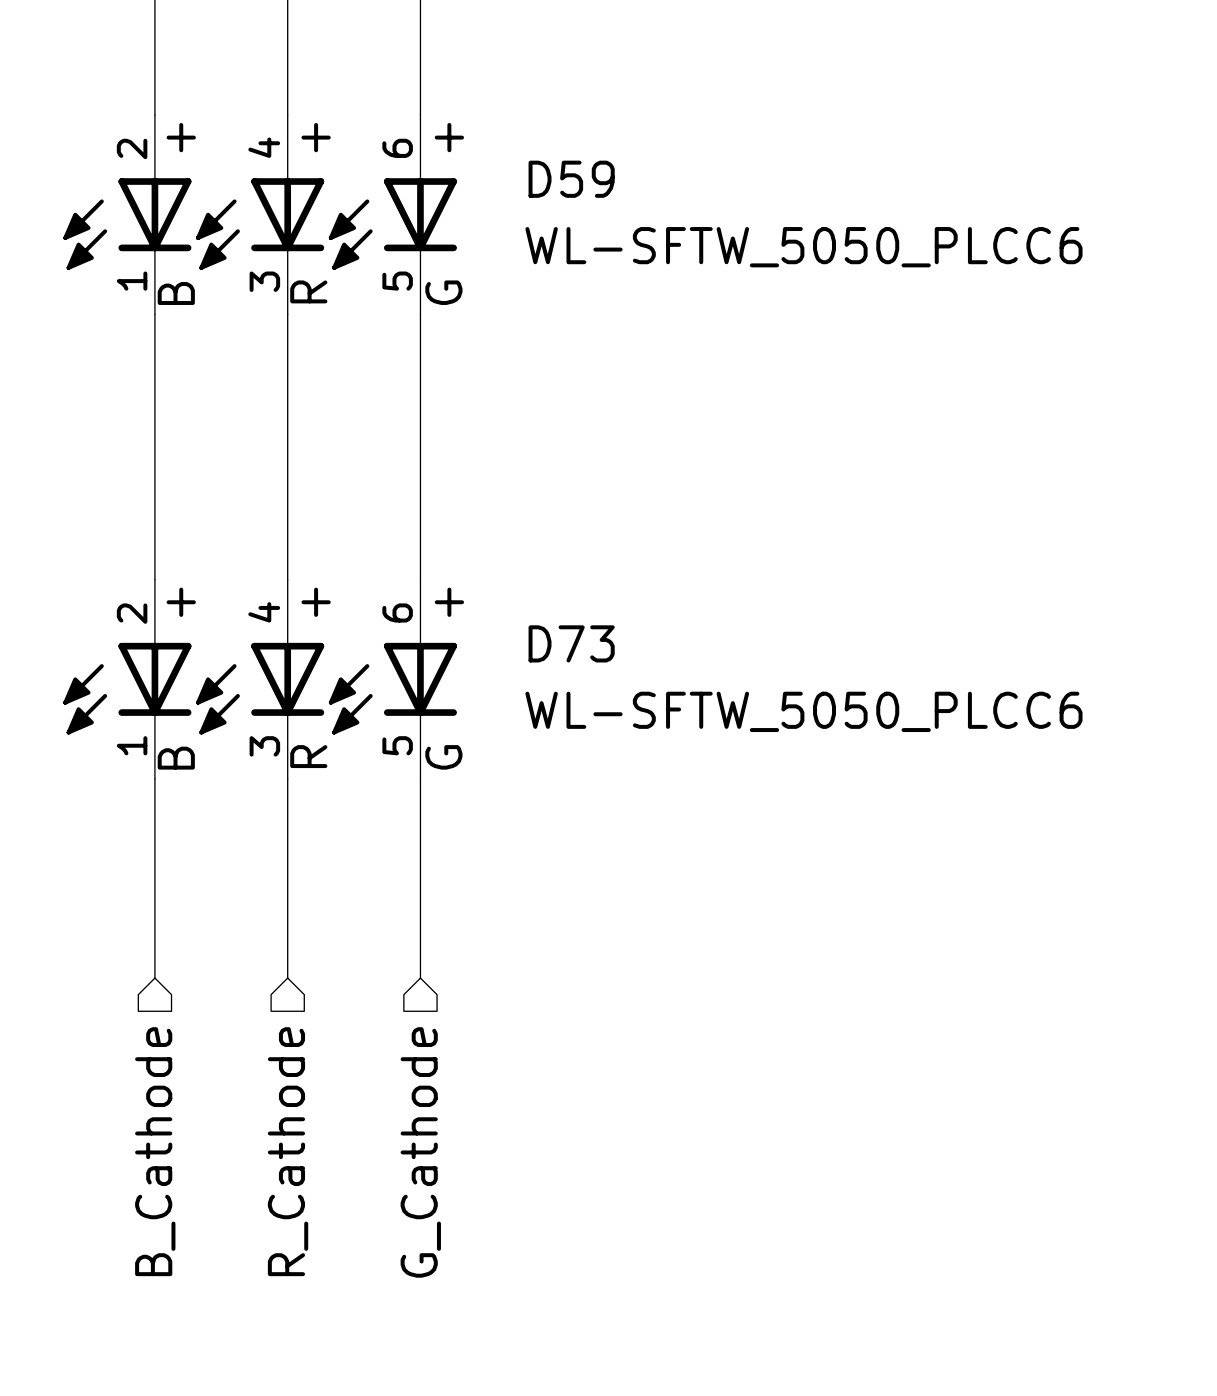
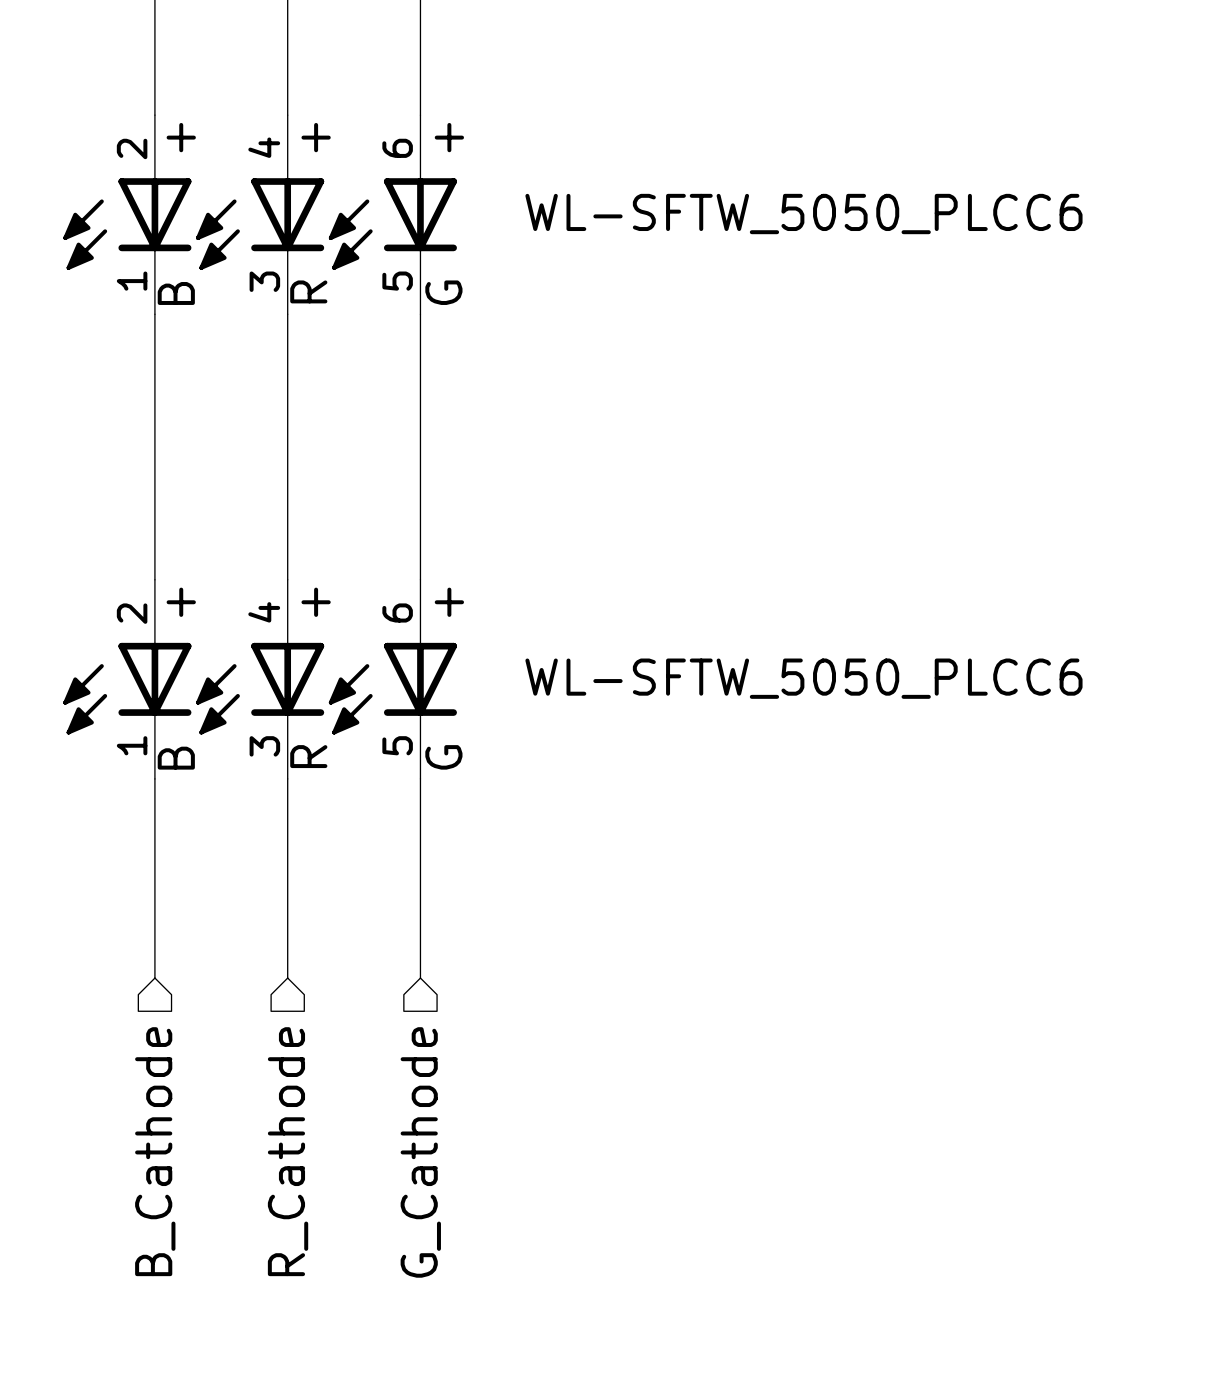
D59 name: D59 (571, 179) -> none
D59 value position: WL-SFTW_5050_PLCC6 (803, 247) -> WL-SFTW_5050_PLCC6 (803, 214)
D73 name: D73 (571, 643) -> none
D73 value position: WL-SFTW_5050_PLCC6 (803, 711) -> WL-SFTW_5050_PLCC6 (803, 678)

